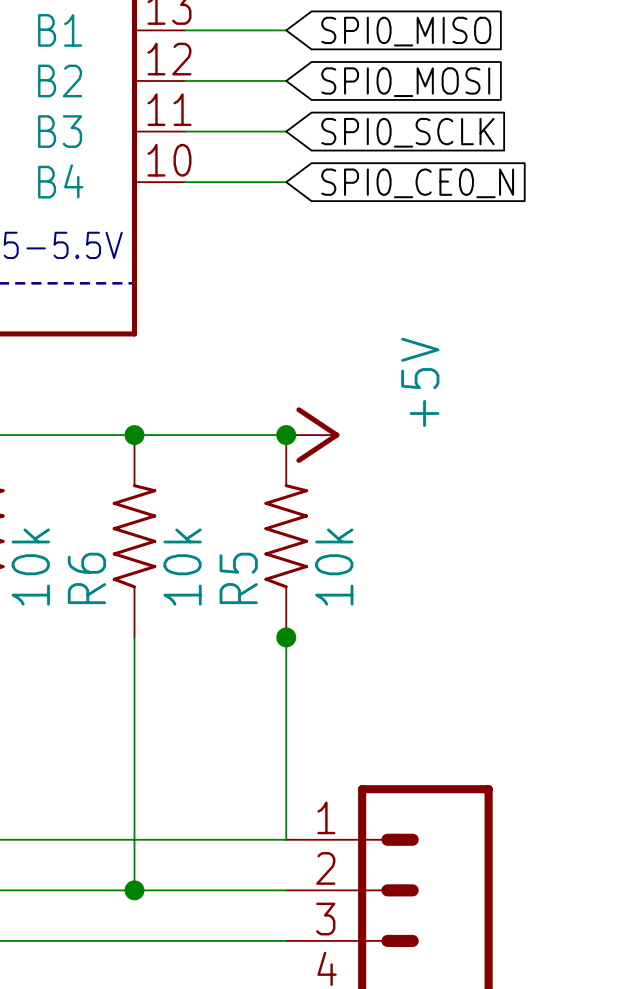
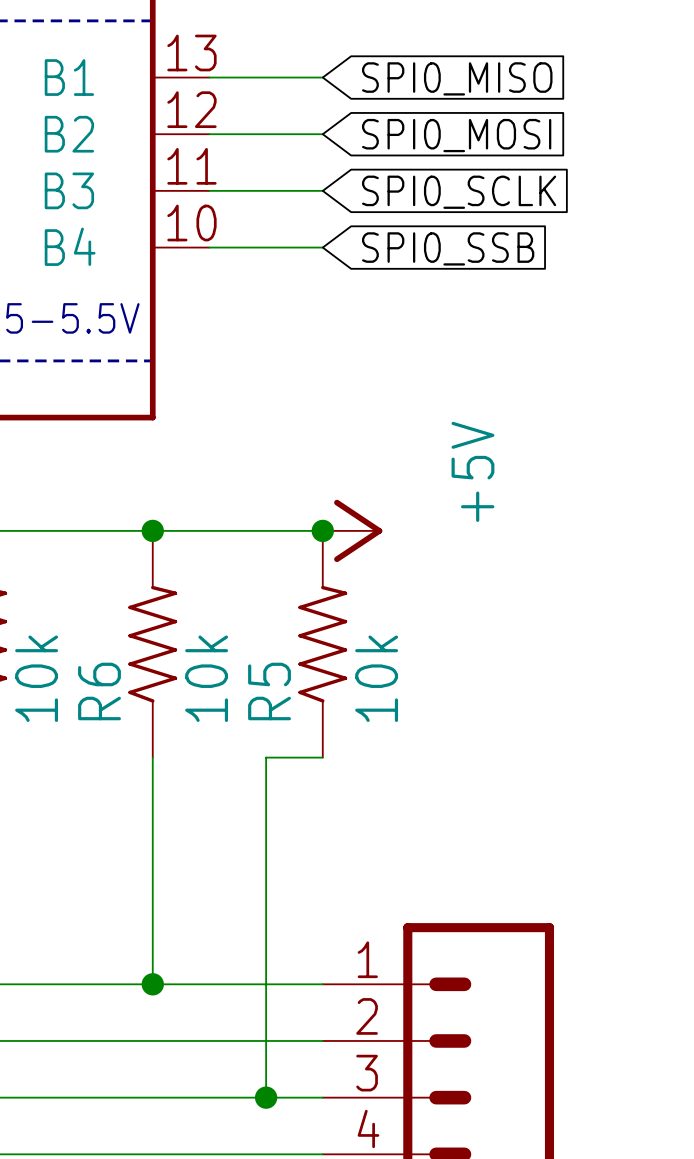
global label: SPI0_CE0_N (417, 183) -> SPI0_SSB (448, 248)
wire: (286, 637) (286, 839) -> (322, 757) (266, 757) (266, 1097)
junction: (286, 637) -> none
wire: (134, 839) (134, 890) -> none
junction position: (134, 890) -> (152, 984)
junction: none -> (266, 1097)

